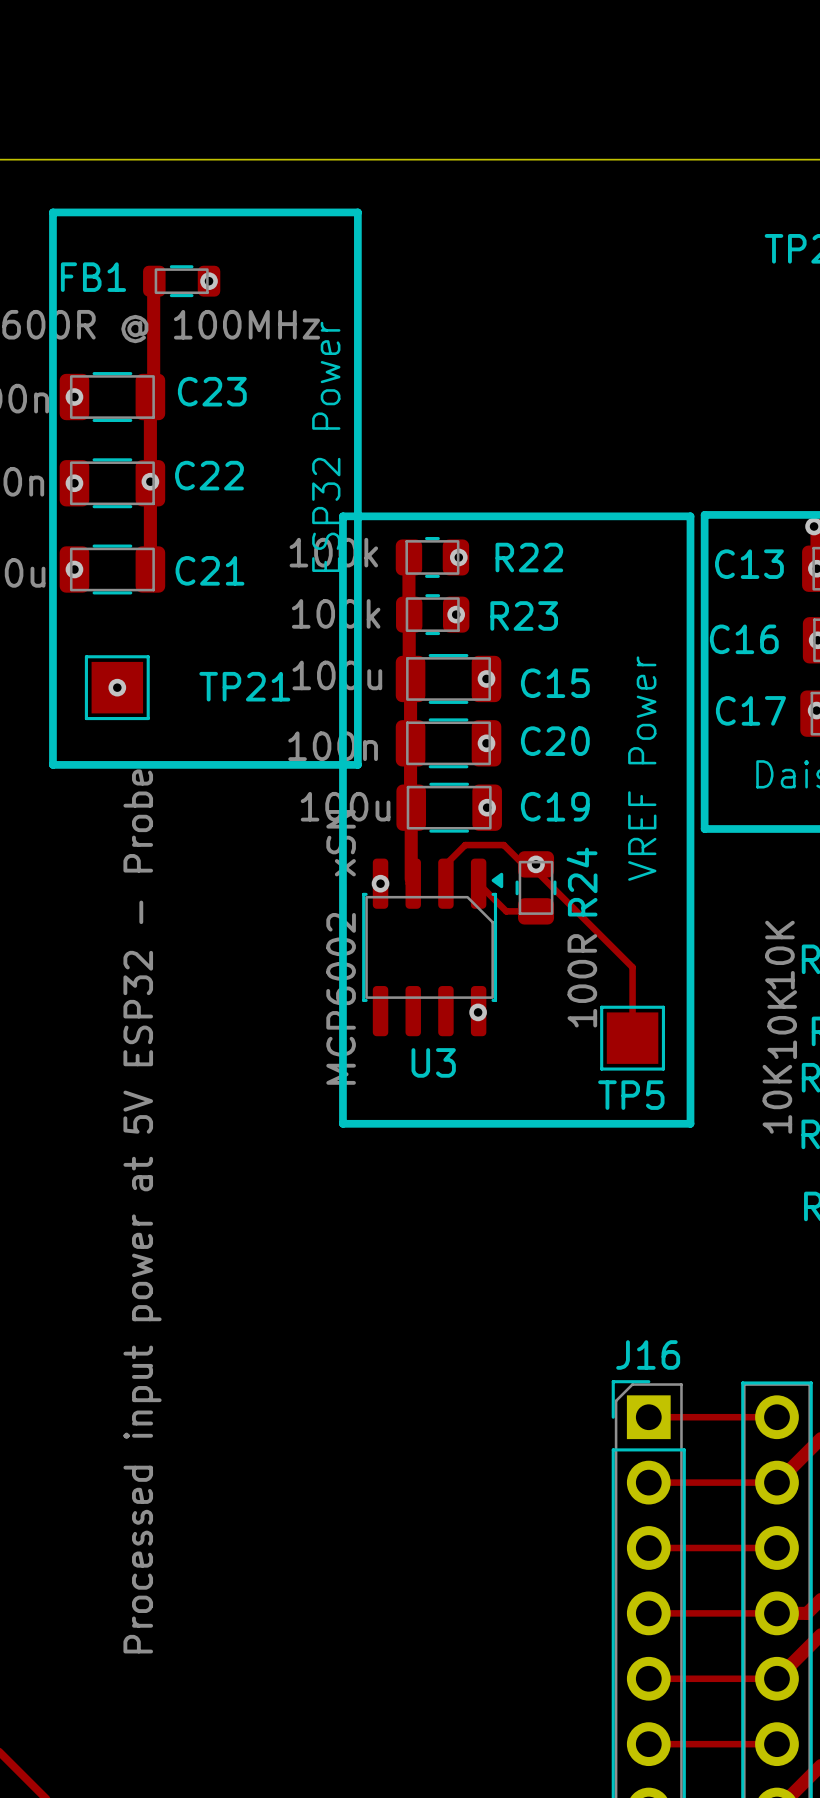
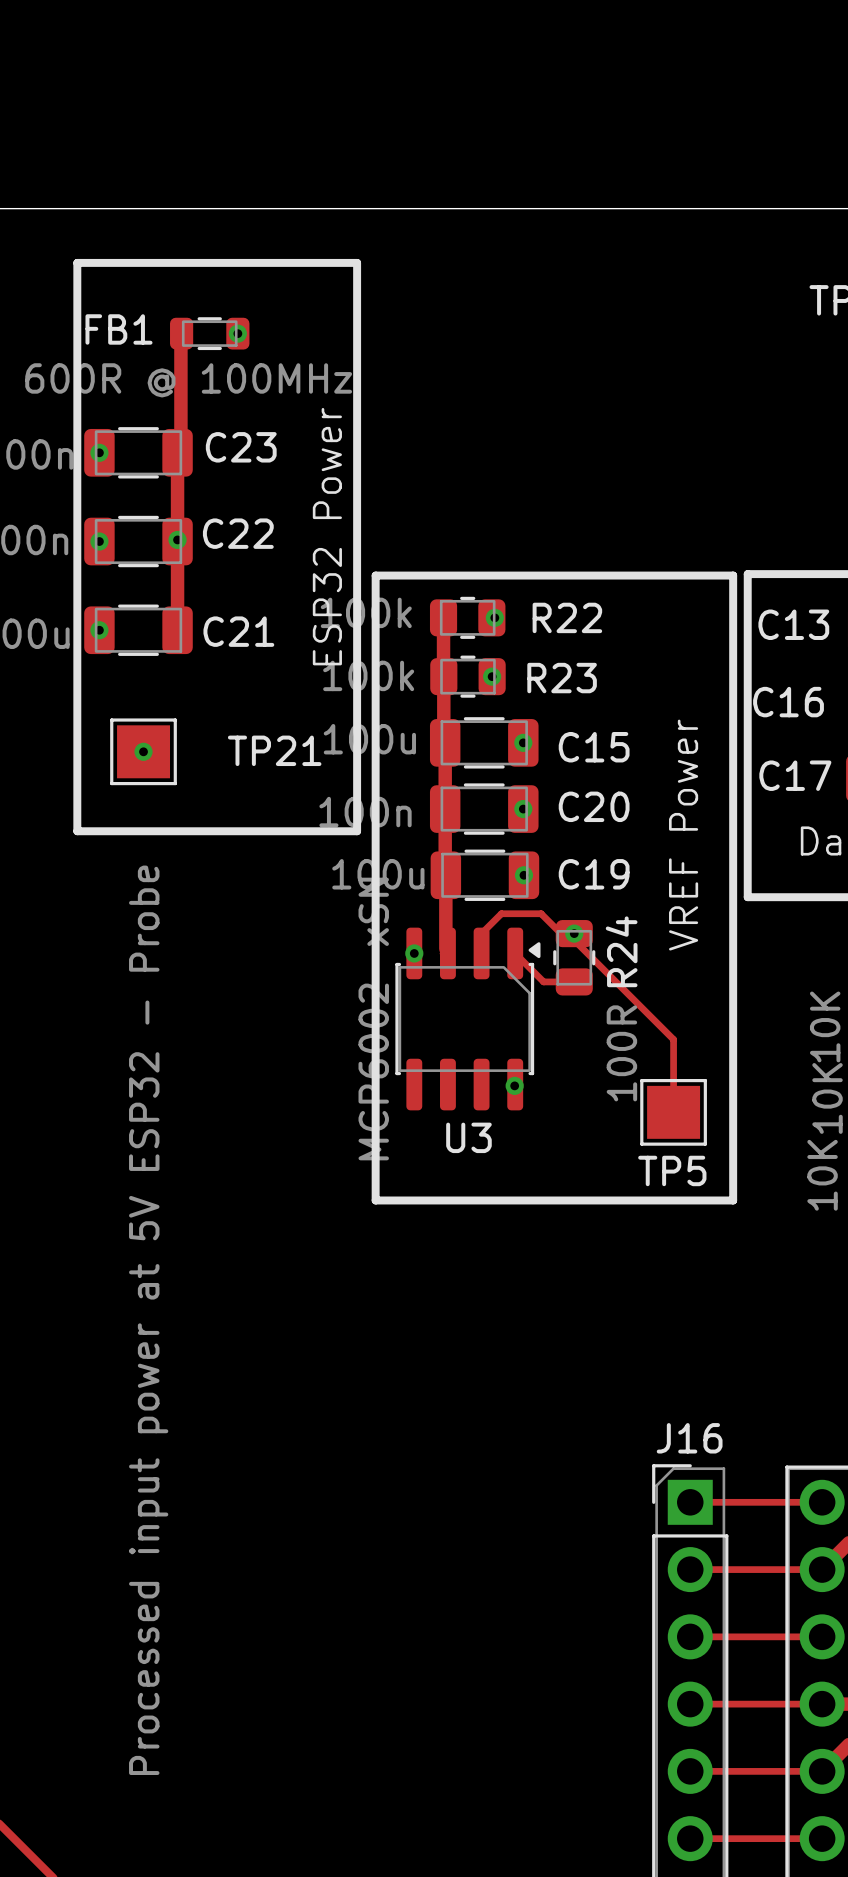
line: (324, 212) (357, 212) (357, 764) (324, 764) -> (357, 262) (357, 831)
text position: ESP32 Power (326, 446) -> ESP32 Power (327, 536)
TP21 value position: Processed input power at 5V ESP32 - Probe (142, 1211) -> Processed input power at 5V ESP32 - Probe (148, 1320)

